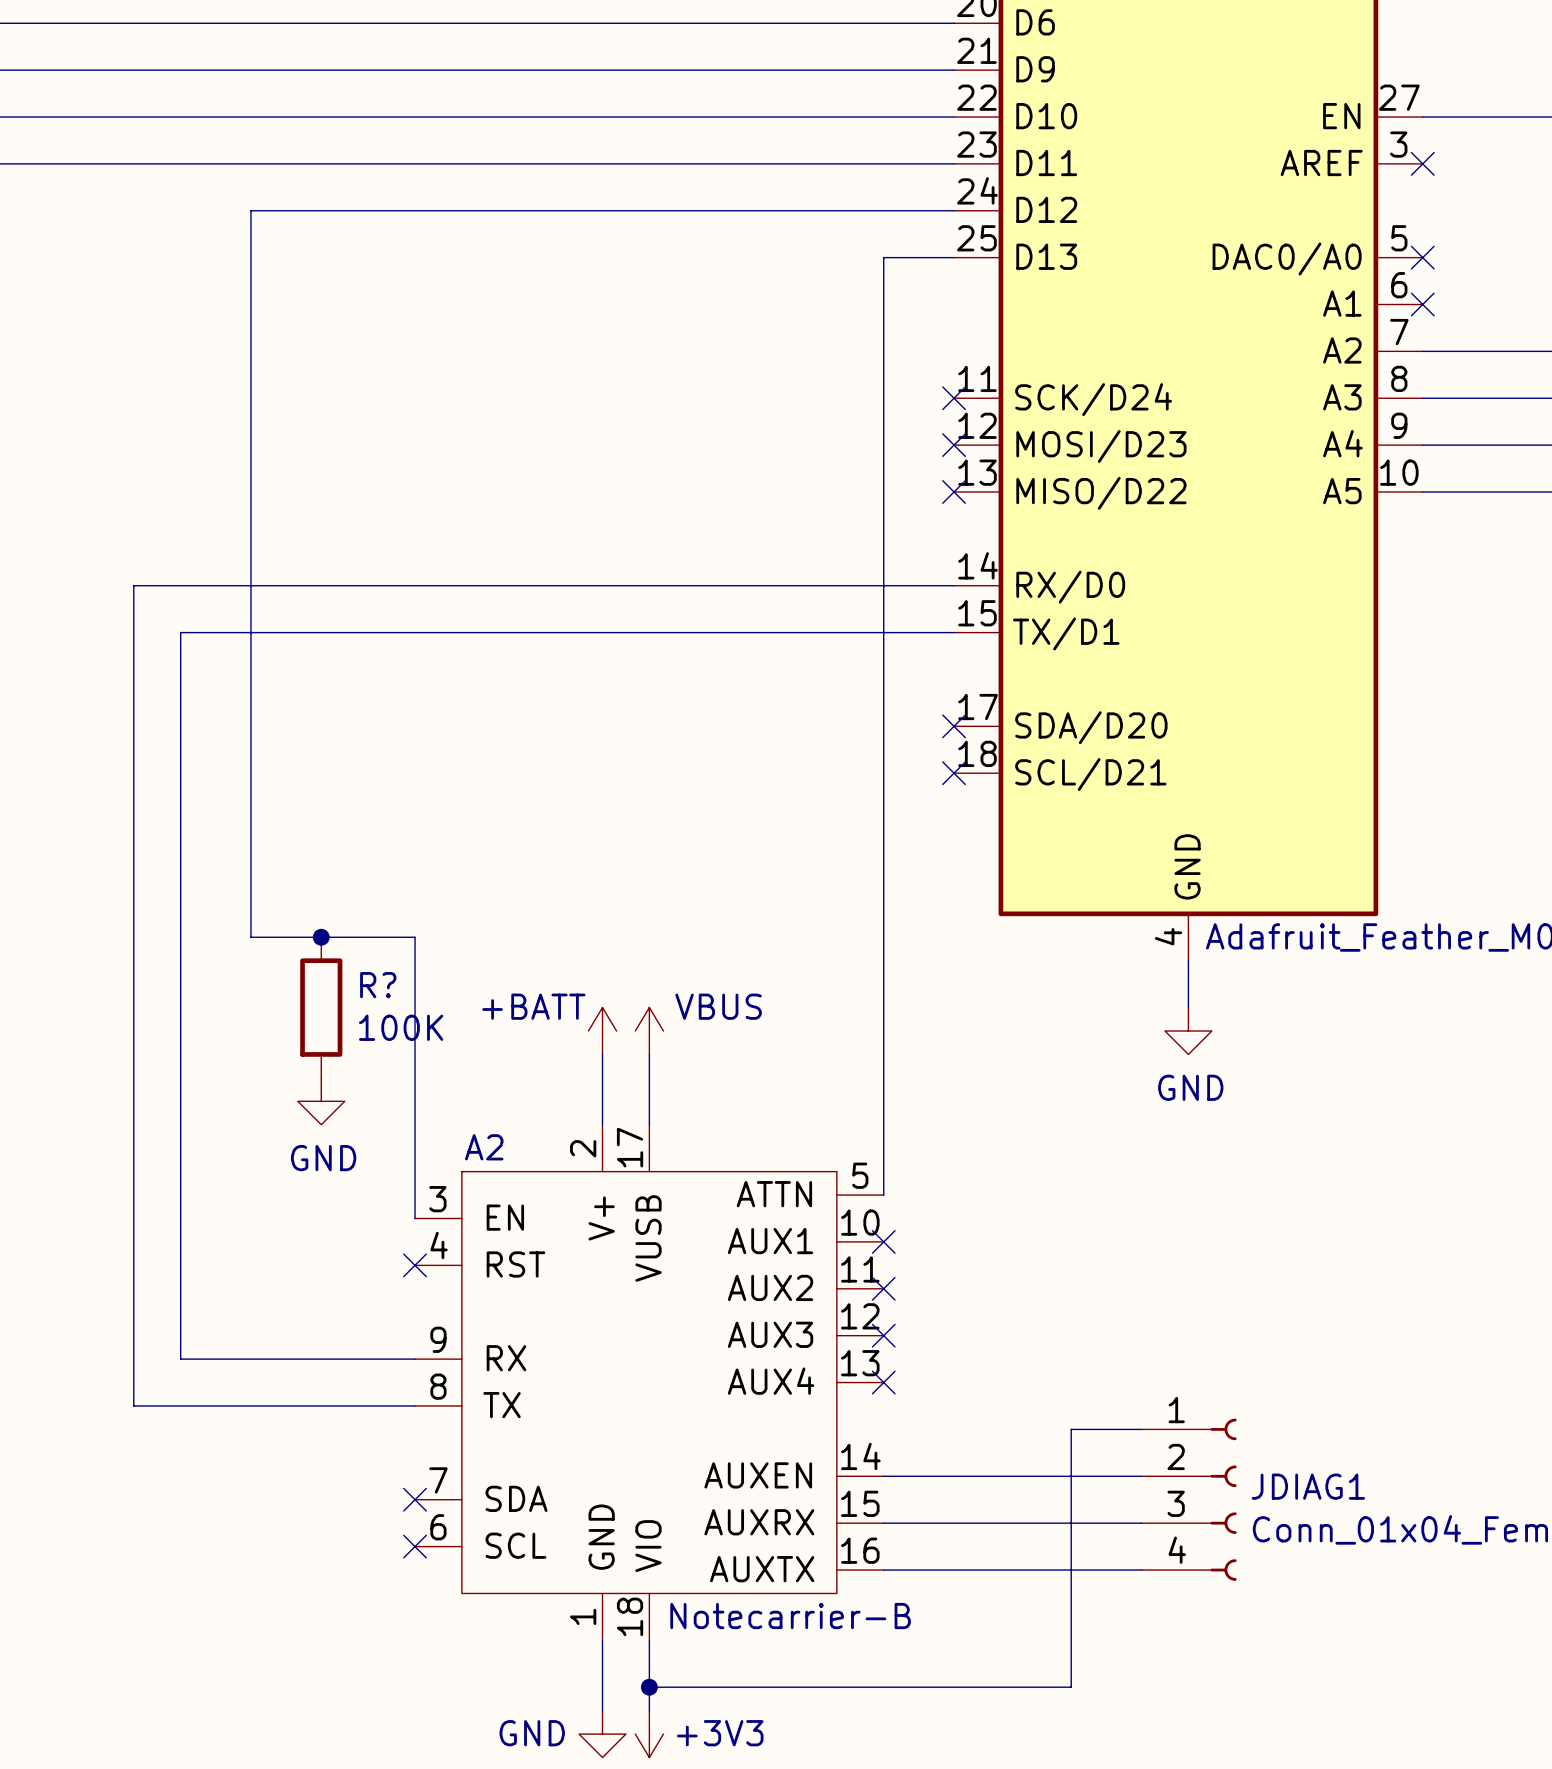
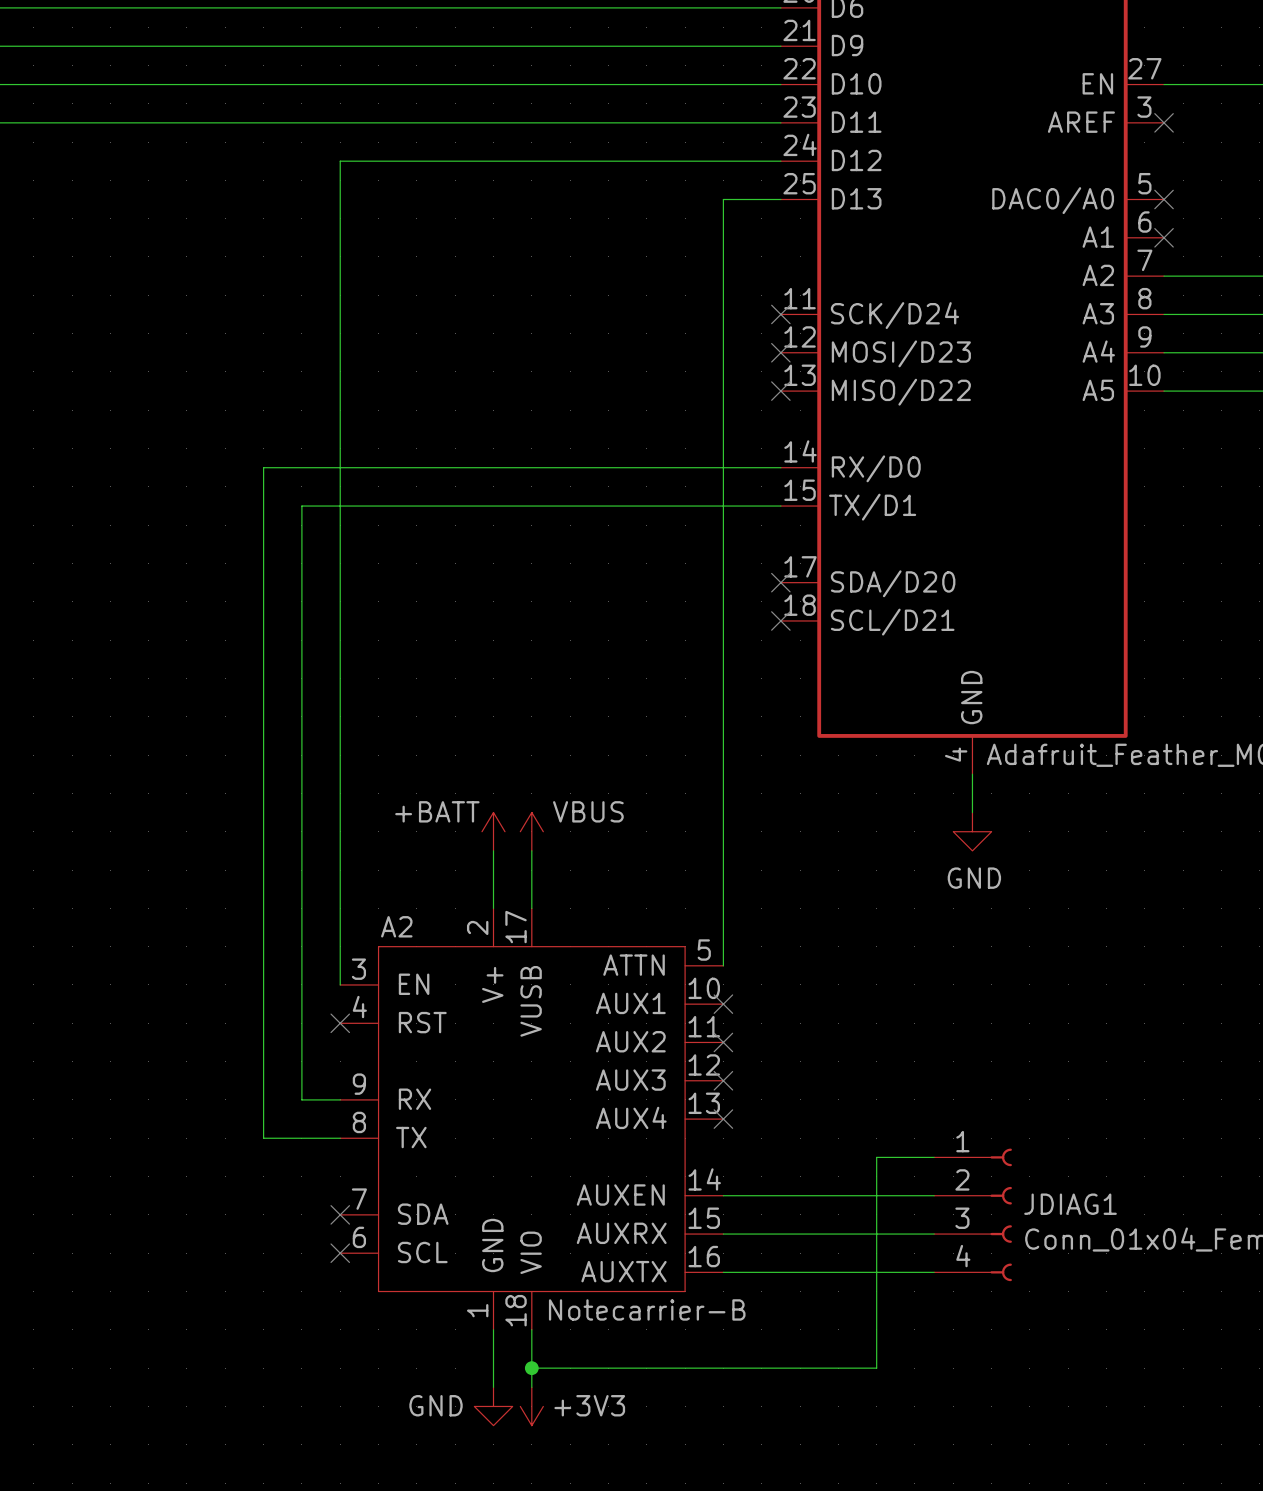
wire: (415, 210) (250, 210) (250, 937) (415, 937) -> (340, 161) (340, 755)
wire: (321, 585) (133, 585) (133, 1405) (321, 1405) -> (263, 467) (263, 1138)
wire: (368, 632) (180, 632) (180, 1359) (368, 1359) -> (301, 506) (301, 1099)
junction: (321, 937) -> none
R?: 100K (321, 1007) -> none
power symbol: GND (321, 1101) -> none

